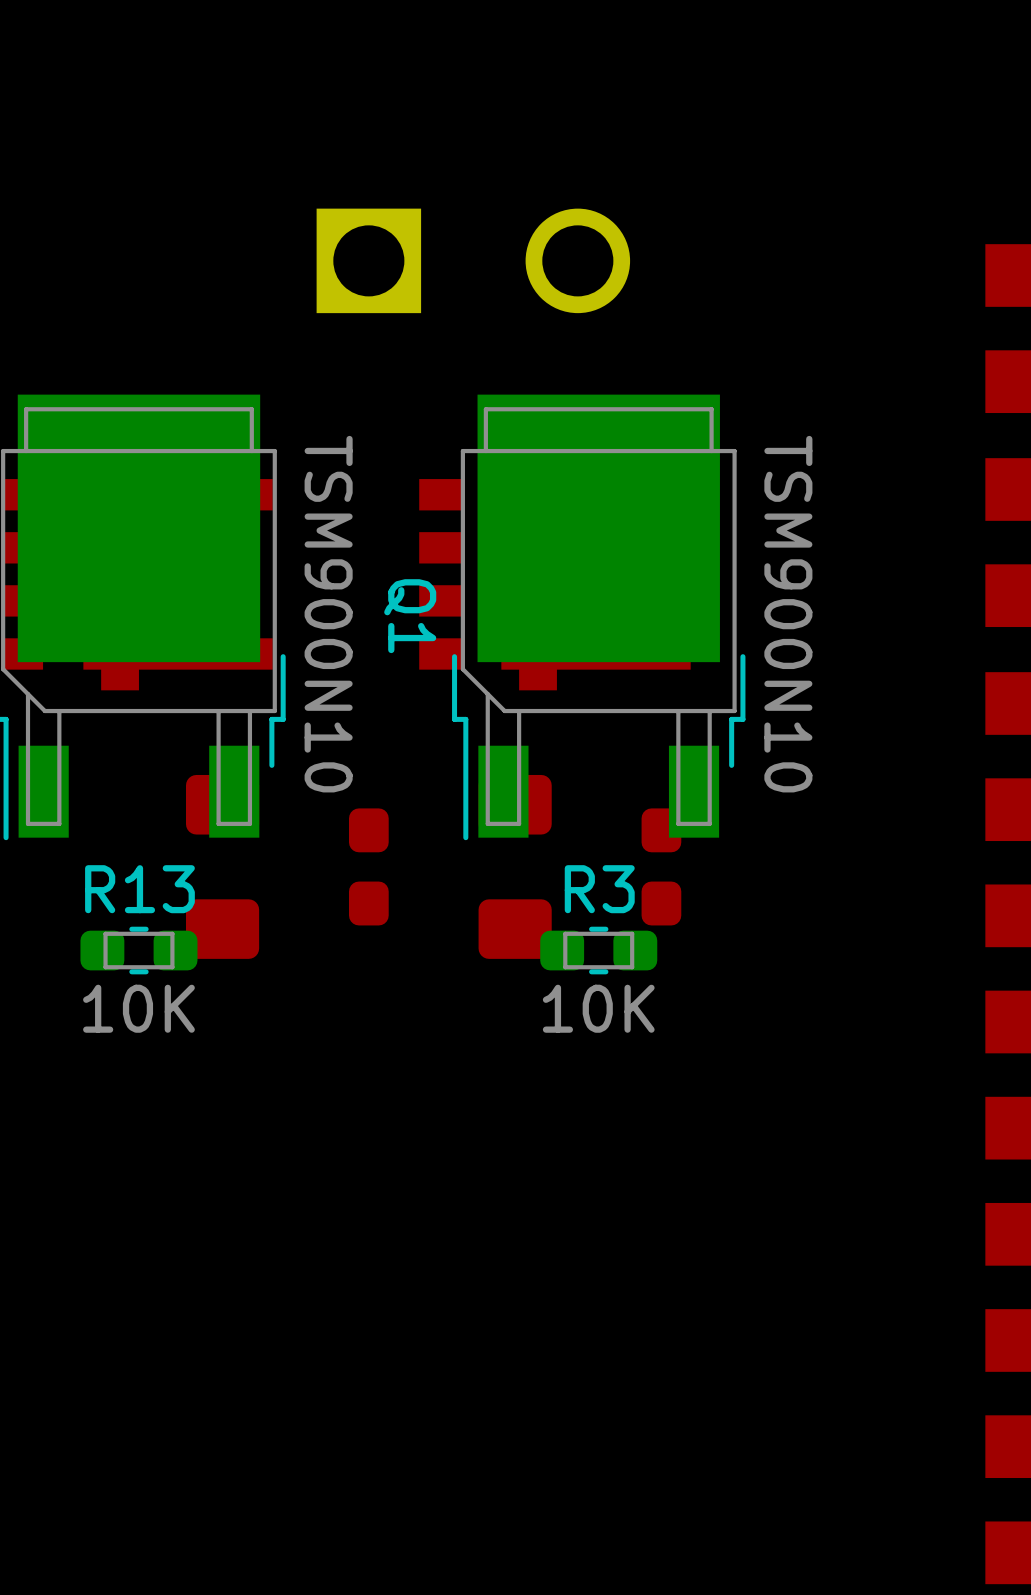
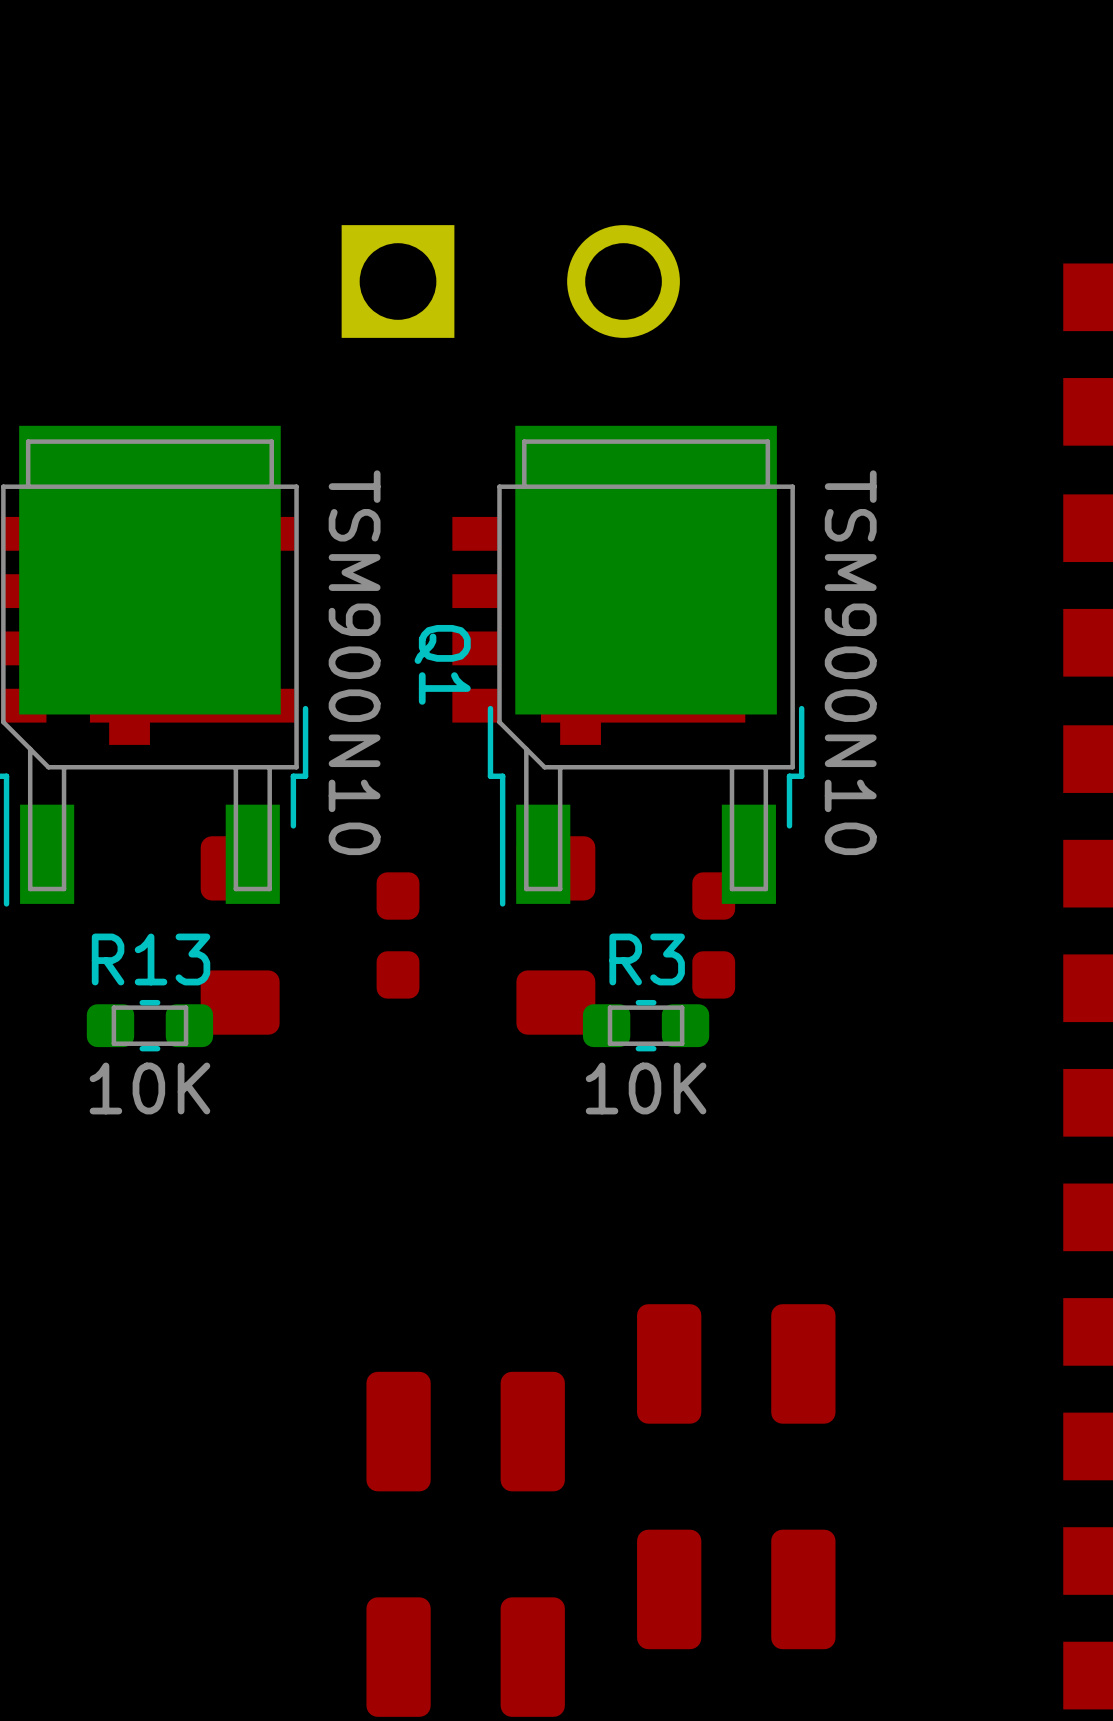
part: none -> (736, 1363)
part: none -> (465, 1431)
part: none -> (736, 1589)
part: none -> (465, 1657)

